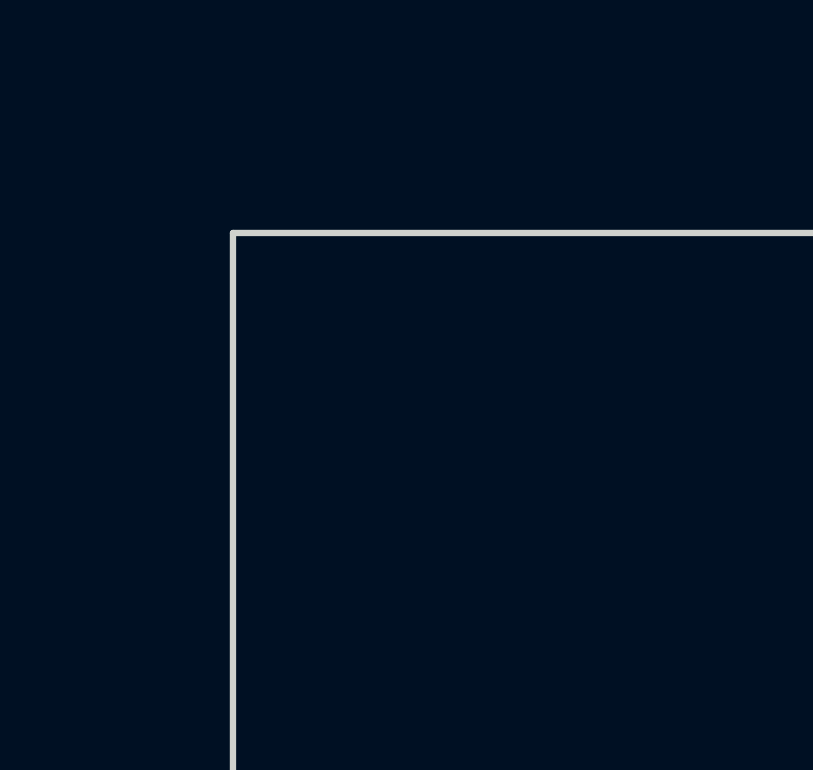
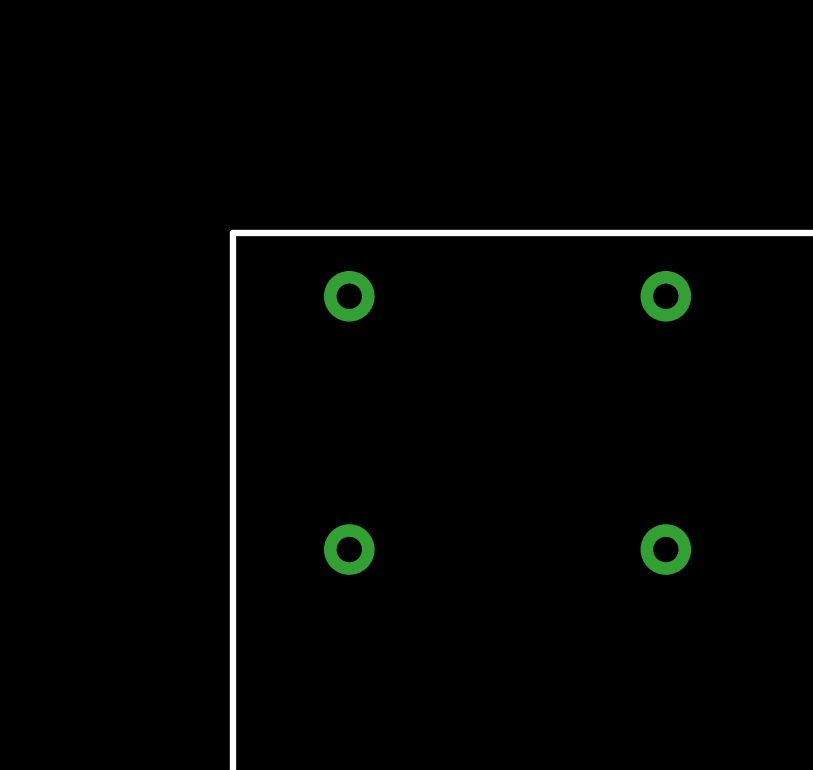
via: none -> (349, 296)
via: none -> (665, 296)
via: none -> (349, 549)
via: none -> (665, 549)

